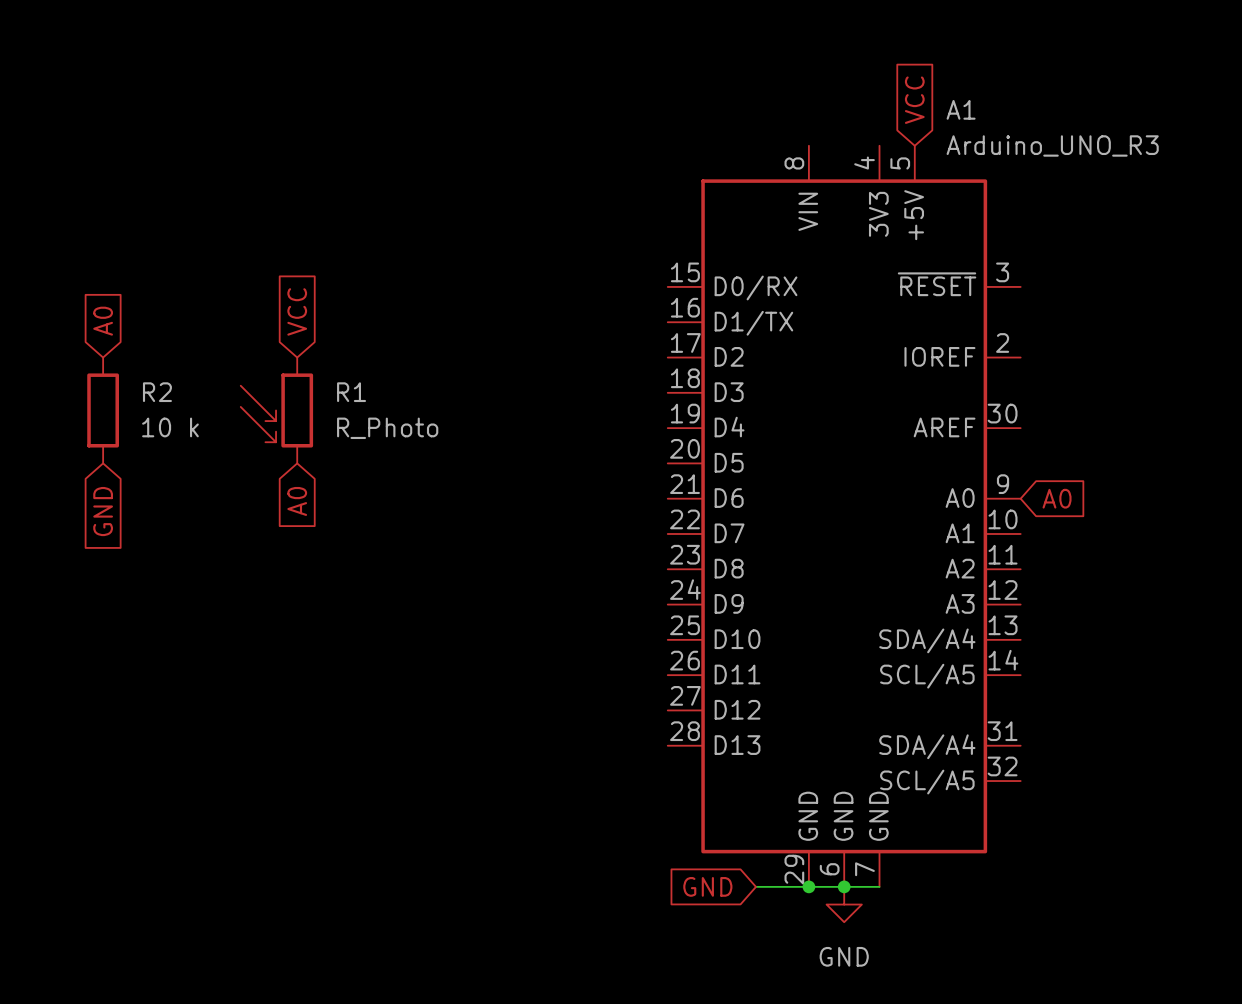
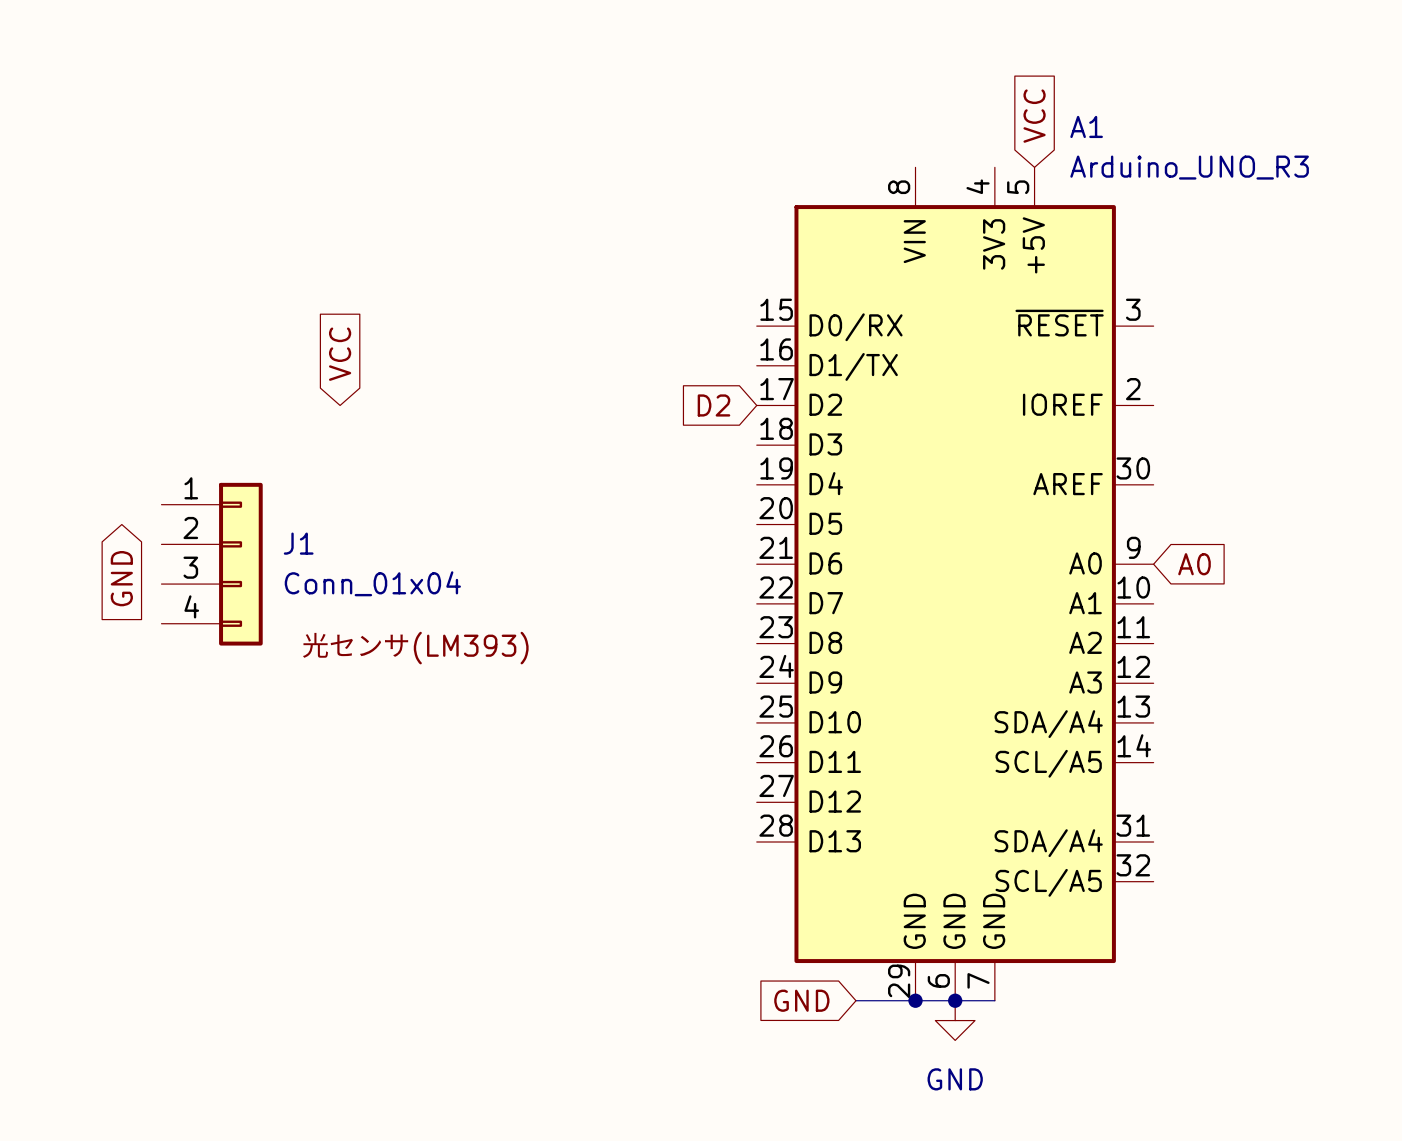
global label: A0 (103, 321) -> none
global label: none -> D2 (713, 405)
R2: 10 k (103, 410) -> none
R1: R_Photo (276, 410) -> none
J1: none -> Conn_01x04 (212, 564)
global label: A0 (297, 501) -> none
label: none -> 光センサ(LM393) (415, 648)

